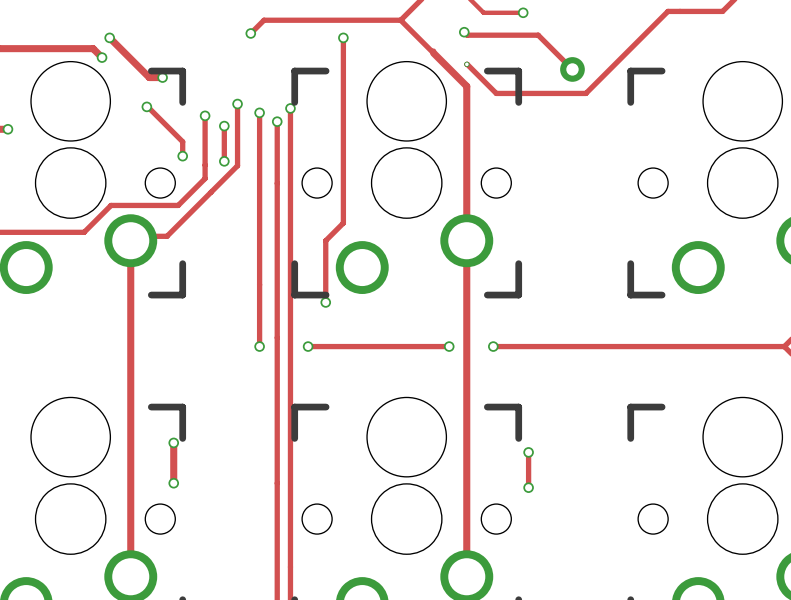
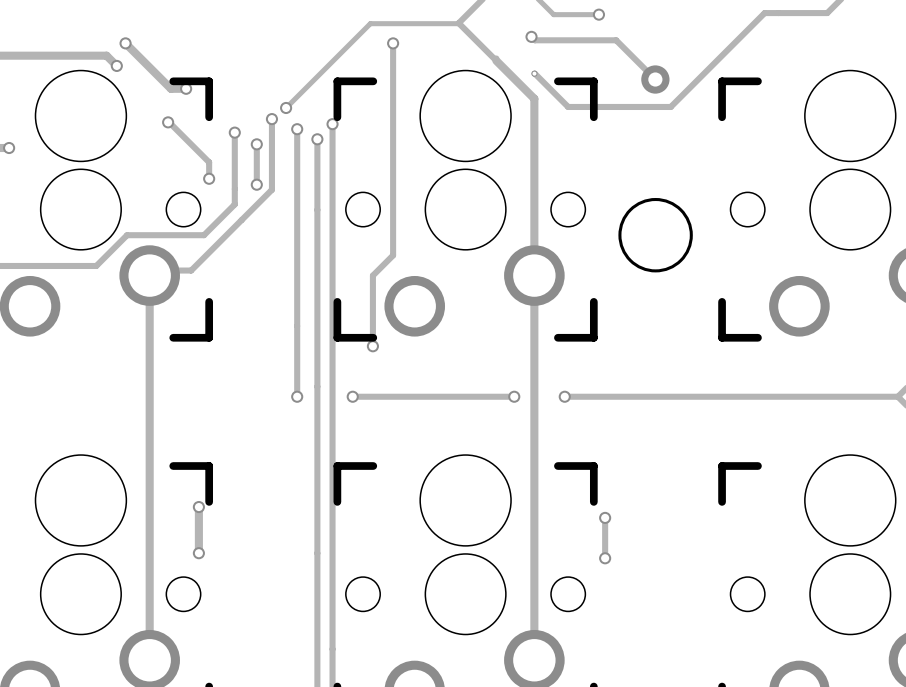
track: (400, 20) (264, 20) (250, 33) -> (458, 23) (370, 23) (286, 107)
via: (250, 33) -> none
via: none -> (286, 107)
round board edge: none -> [618, 197, 693, 273]

